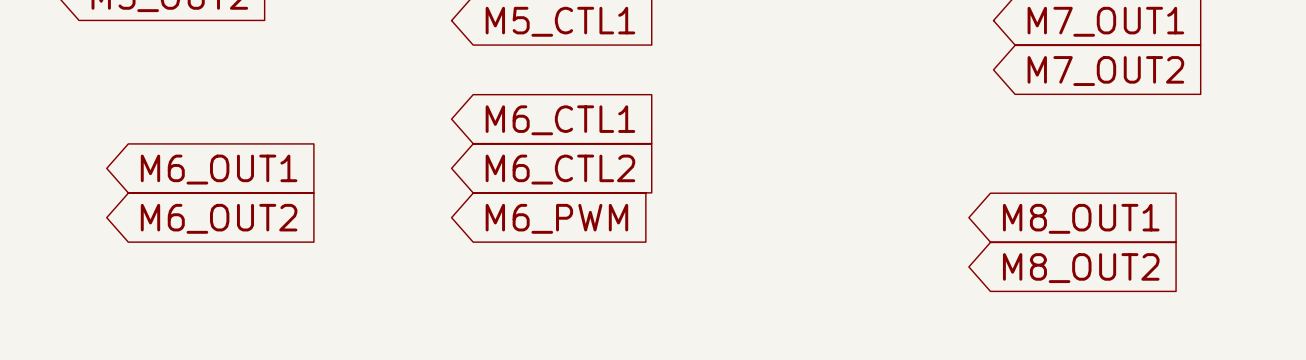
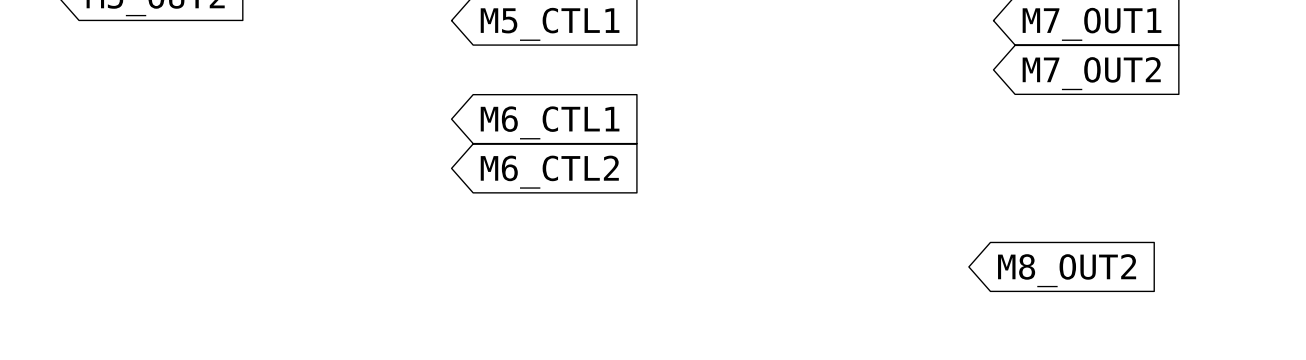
global label: M6_OUT1 (219, 169) -> none
global label: M6_OUT2 (219, 218) -> none
global label: M6_PWM (556, 218) -> none
global label: M8_OUT1 (1081, 218) -> none

